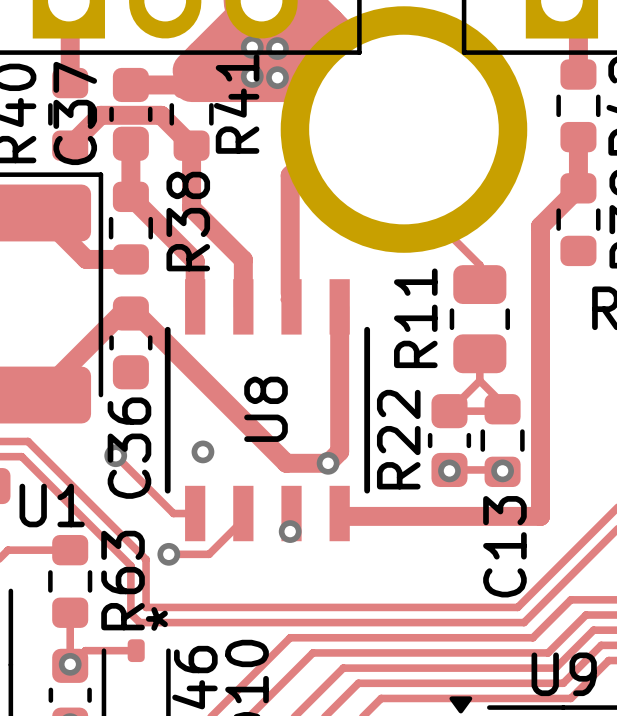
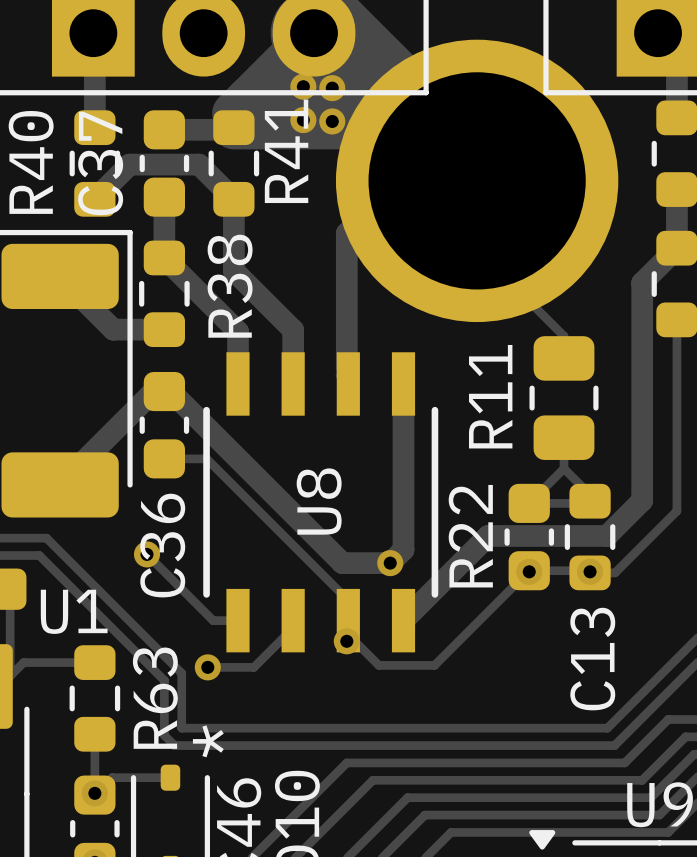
track: (548, 218) (540, 226) (540, 516) (342, 516) (339, 513) -> (642, 282) (642, 500) (606, 535) (488, 535) (403, 620)
track: none -> (676, 319) (676, 510) (615, 572) (590, 572)
track: none -> (164, 458) (206, 458) (348, 600) (348, 612)
via: (202, 451) -> none
track: none -> (528, 571) (434, 665) (378, 665) (354, 641)

